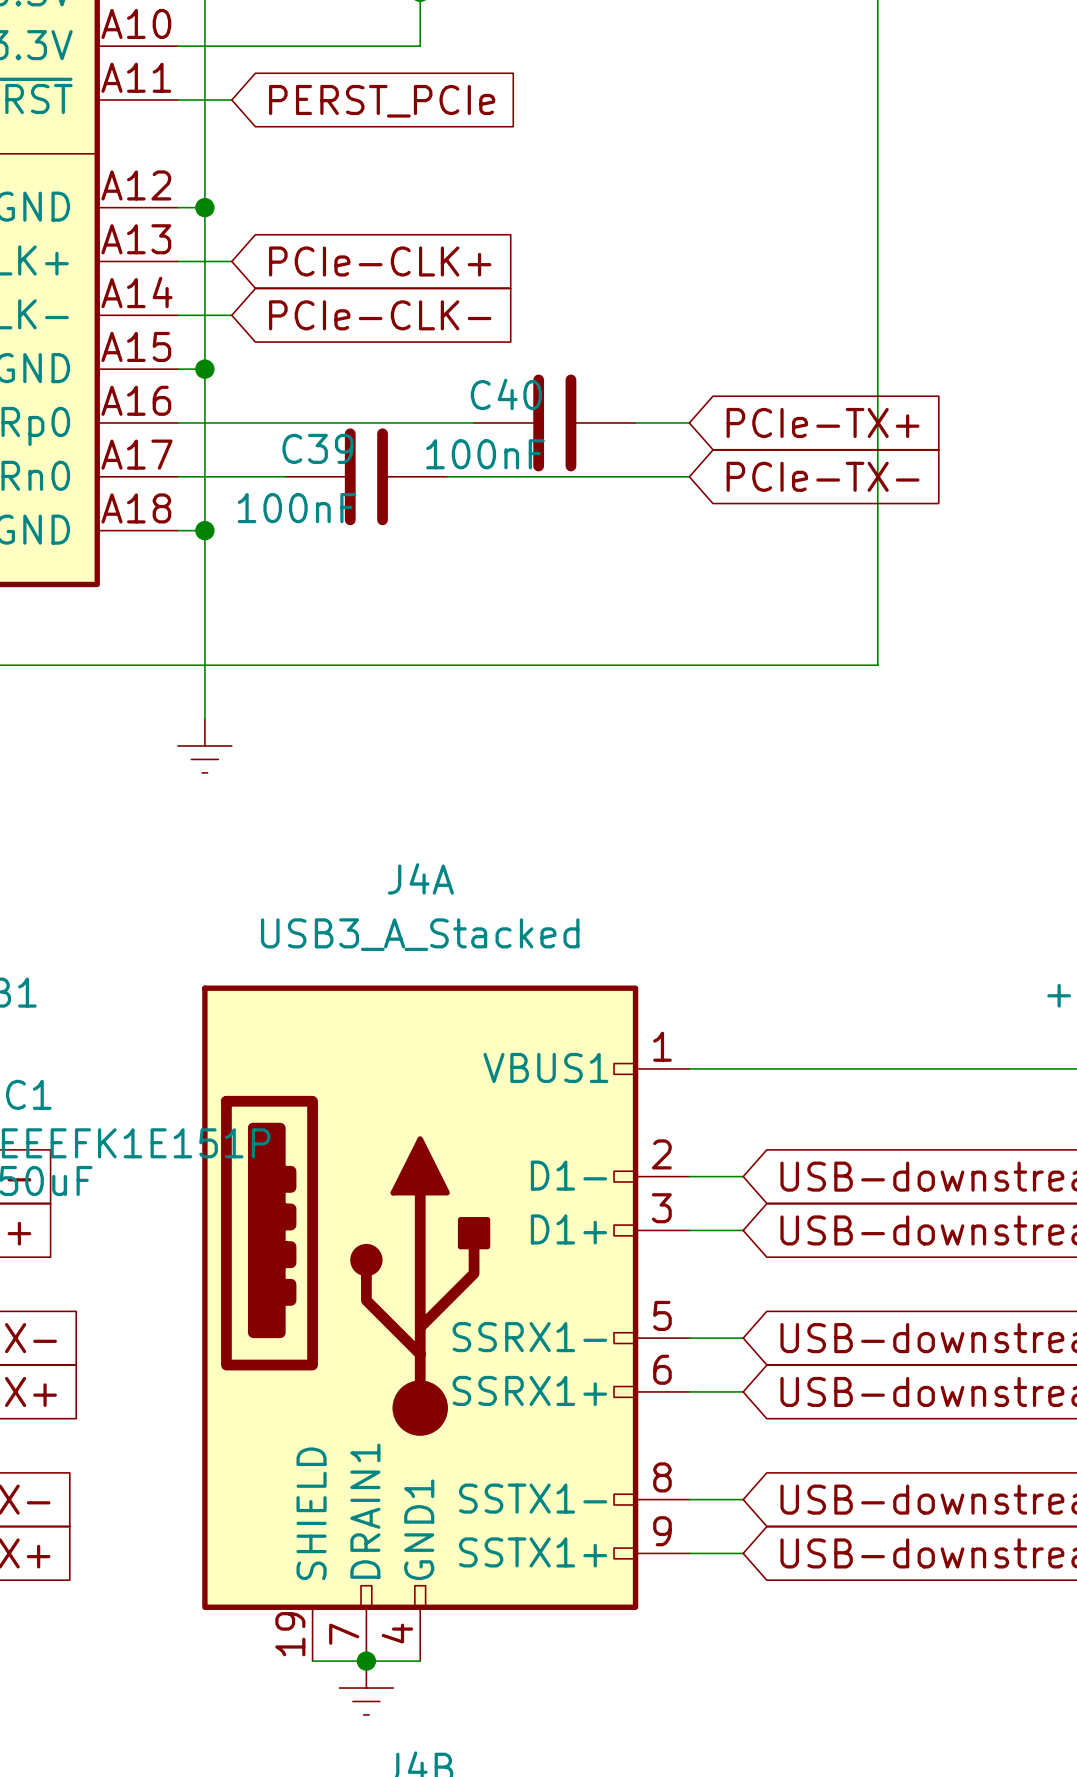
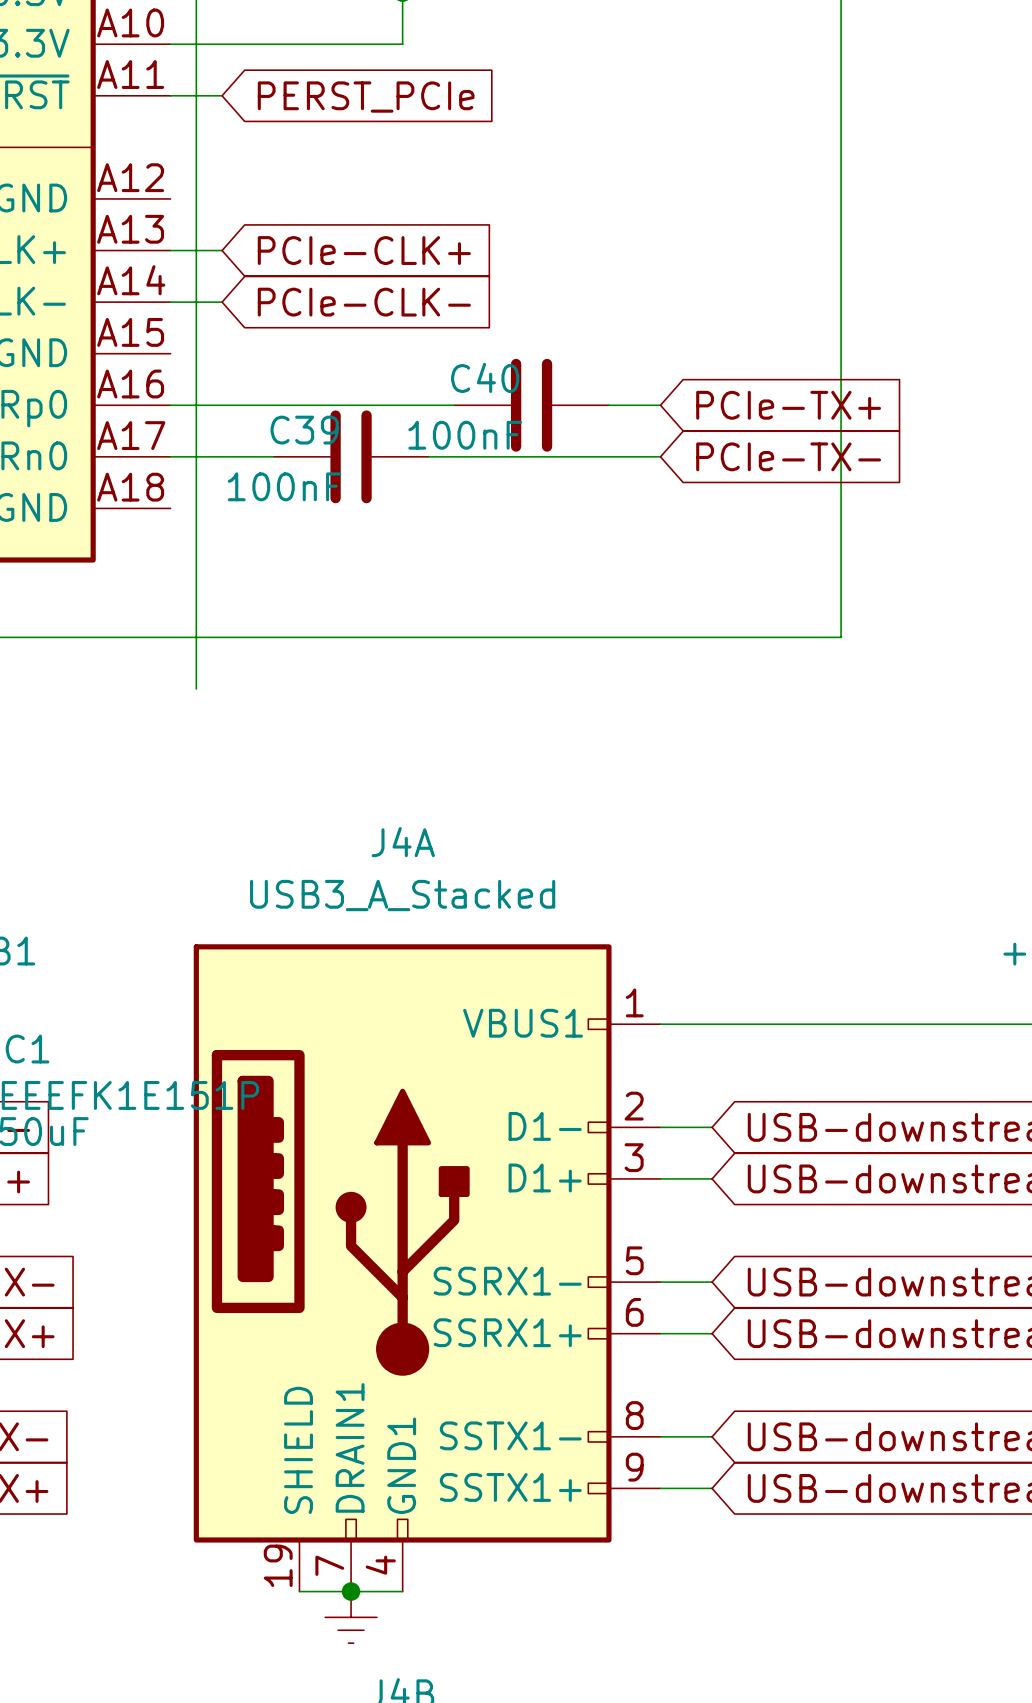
wire: (177, 207) (204, 207) -> none
junction: (204, 207) -> none
wire: (177, 369) (204, 369) -> none
junction: (204, 369) -> none
wire: (177, 530) (204, 530) -> none
junction: (204, 530) -> none
power symbol: (204, 745) -> none

